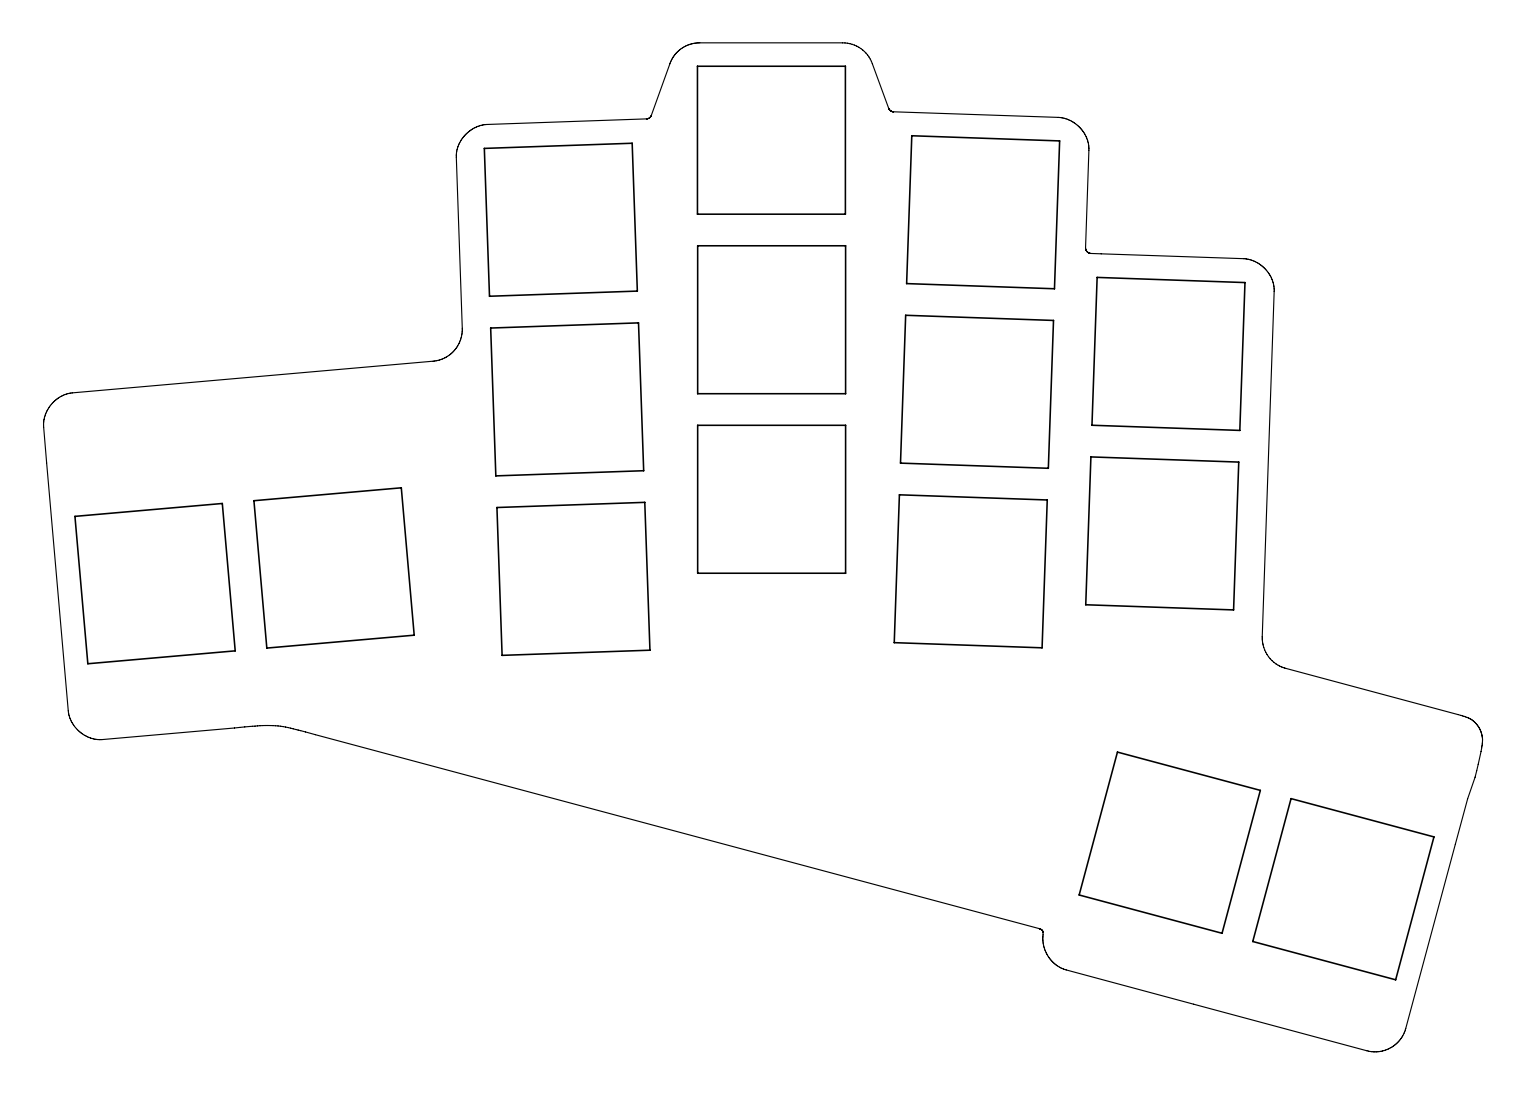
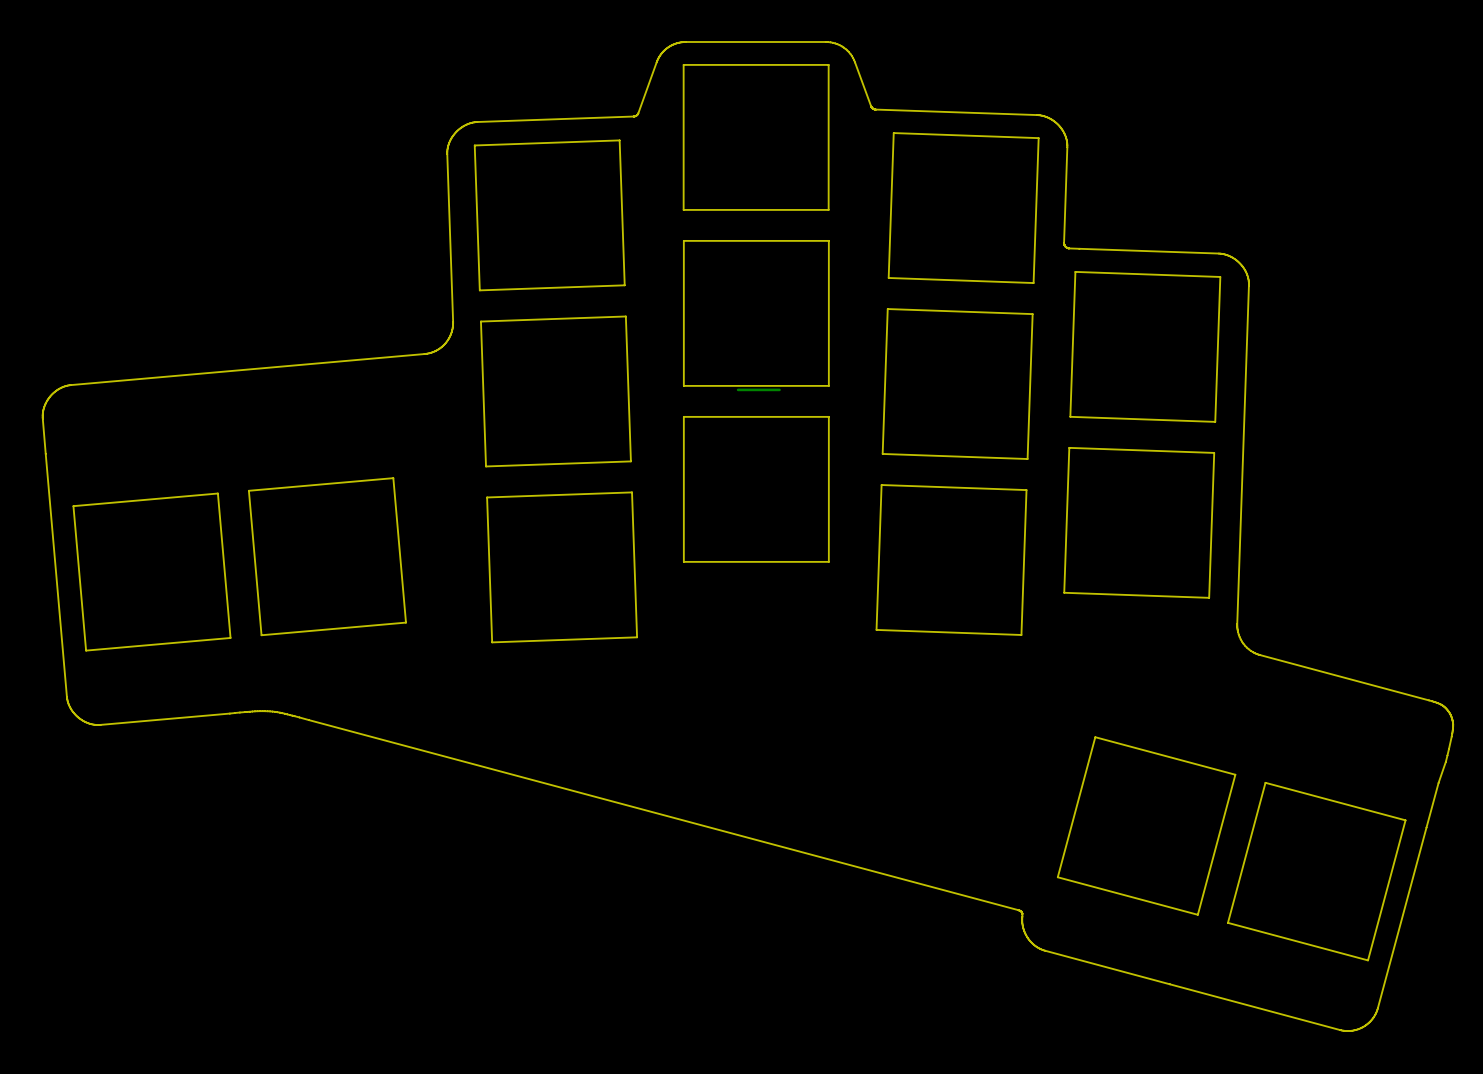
bottom track: none -> (779, 389) (738, 389)

